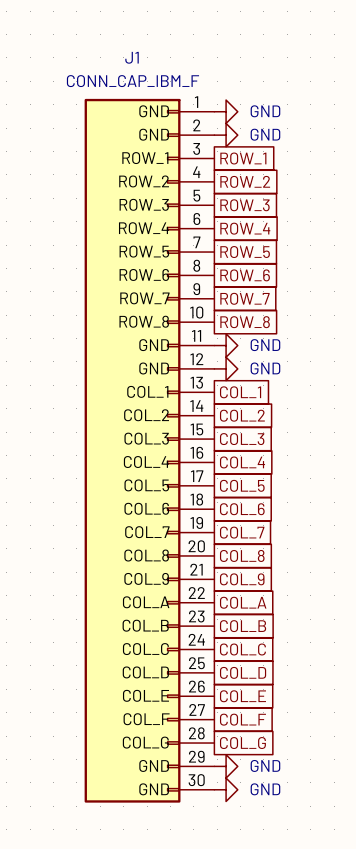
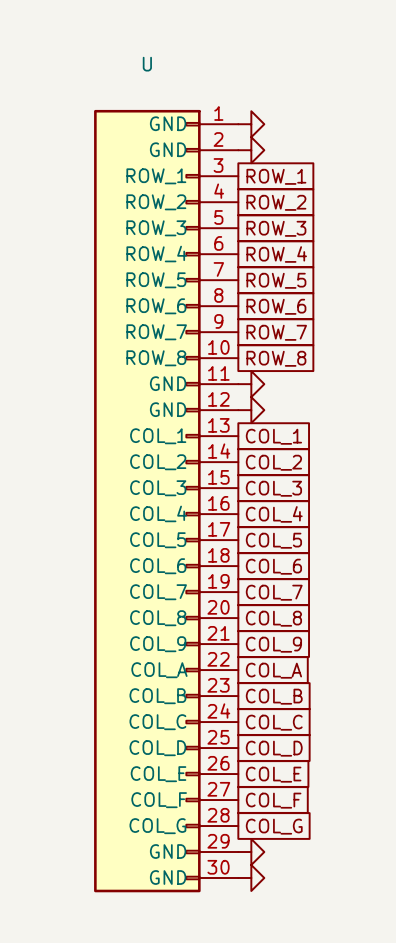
J1 name: J1 (132, 57) -> U (147, 64)
J1 value: CONN_CAP_IBM_F (132, 81) -> none
power symbol text: GND (265, 111) -> none
power symbol text: GND (265, 134) -> none
power symbol text: GND (265, 345) -> none
power symbol text: GND (265, 368) -> none
power symbol text: GND (265, 765) -> none
power symbol text: GND (265, 789) -> none

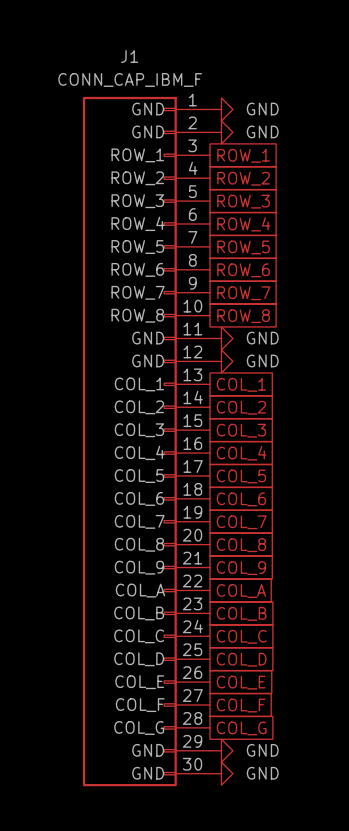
U name: U (147, 64) -> J1 (129, 56)
U value: none -> CONN_CAP_IBM_F (130, 79)
power symbol text: none -> GND (262, 109)
power symbol text: none -> GND (262, 131)
power symbol text: none -> GND (262, 338)
power symbol text: none -> GND (262, 360)
power symbol text: none -> GND (262, 750)
power symbol text: none -> GND (262, 773)

